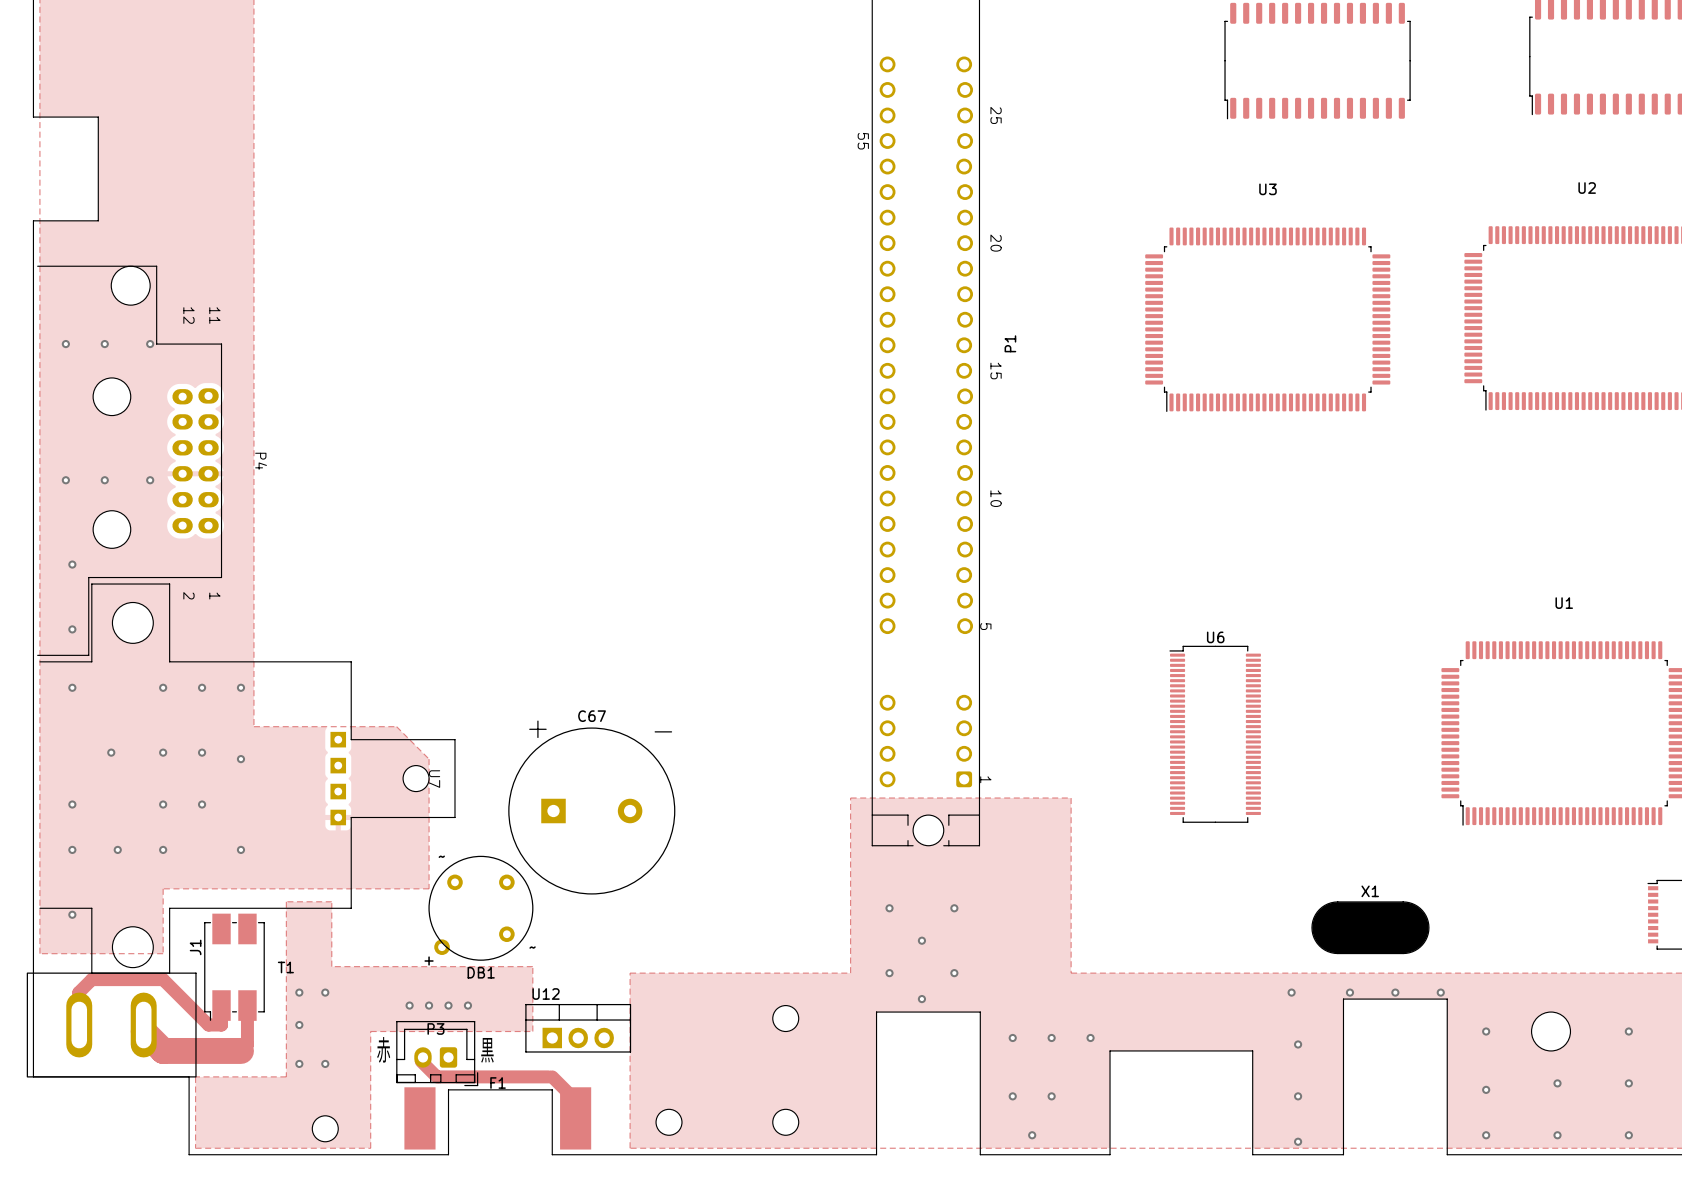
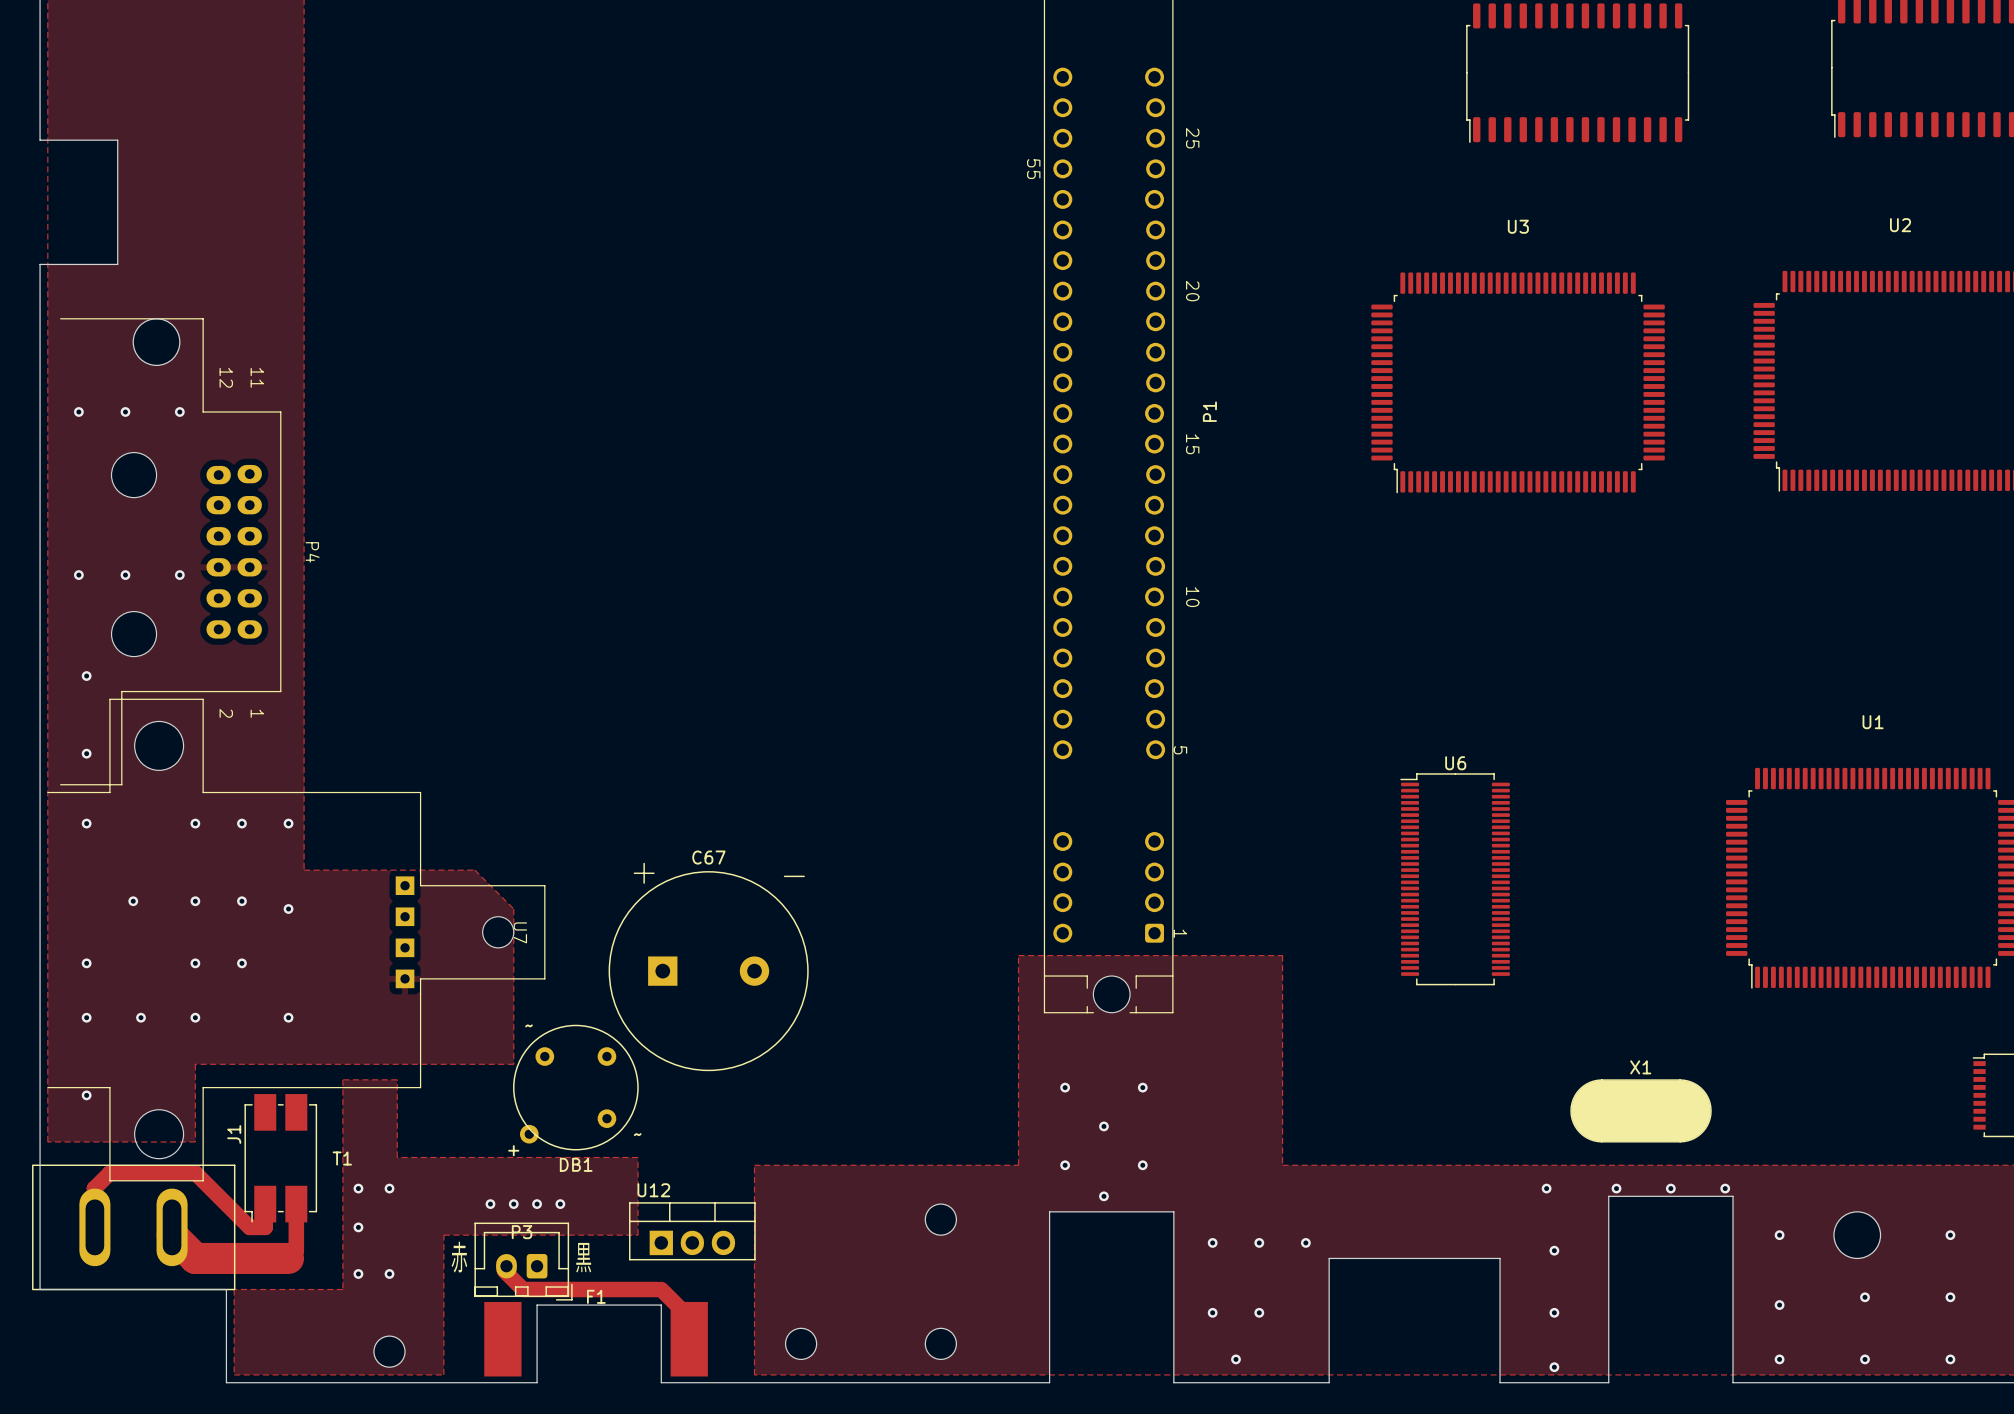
P4 footprint: [37, 265, 223, 656] -> [60, 318, 282, 786]
U7 footprint: [39, 583, 456, 974] -> [47, 698, 546, 1182]

